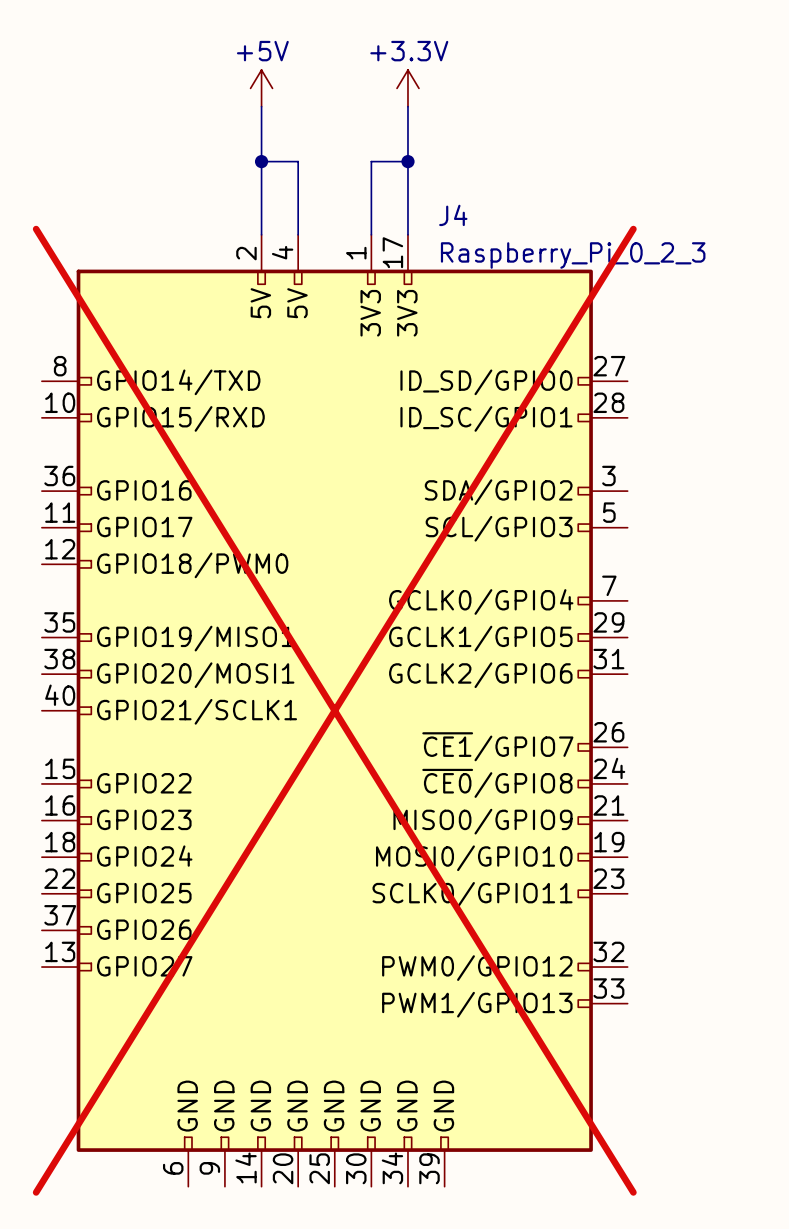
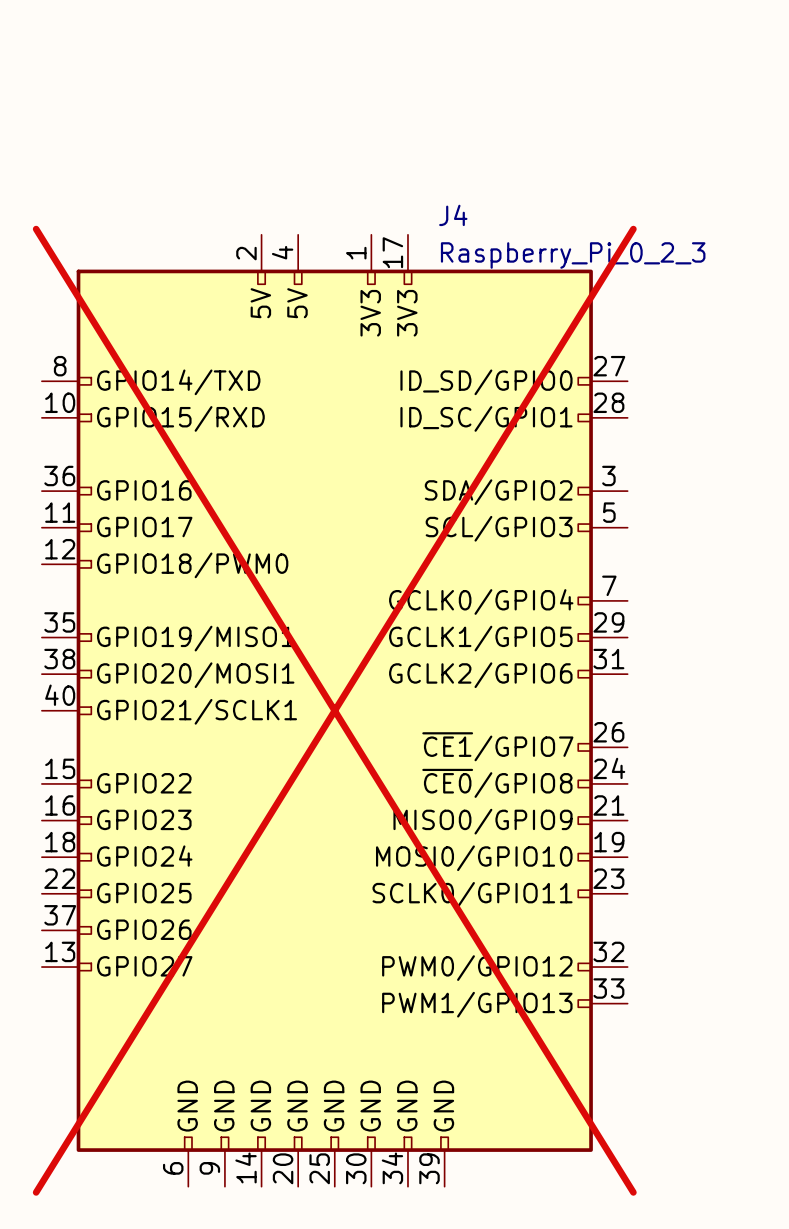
power symbol: +5V (261, 88) -> none
power symbol: +3.3V (407, 88) -> none
wire: (261, 106) (261, 234) -> none
wire: (407, 106) (407, 234) -> none
wire: (261, 161) (298, 161) (298, 234) -> none
junction: (261, 161) -> none
wire: (407, 161) (371, 161) (371, 234) -> none
junction: (407, 161) -> none

